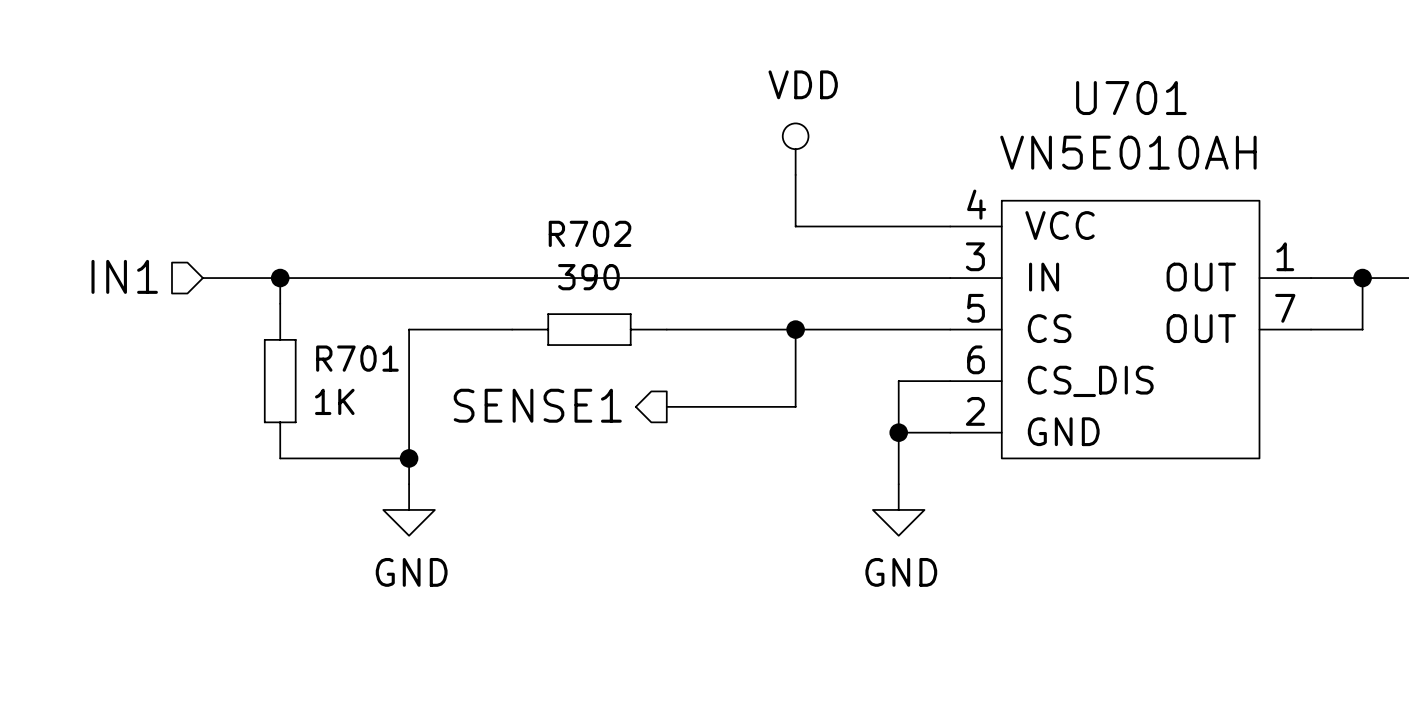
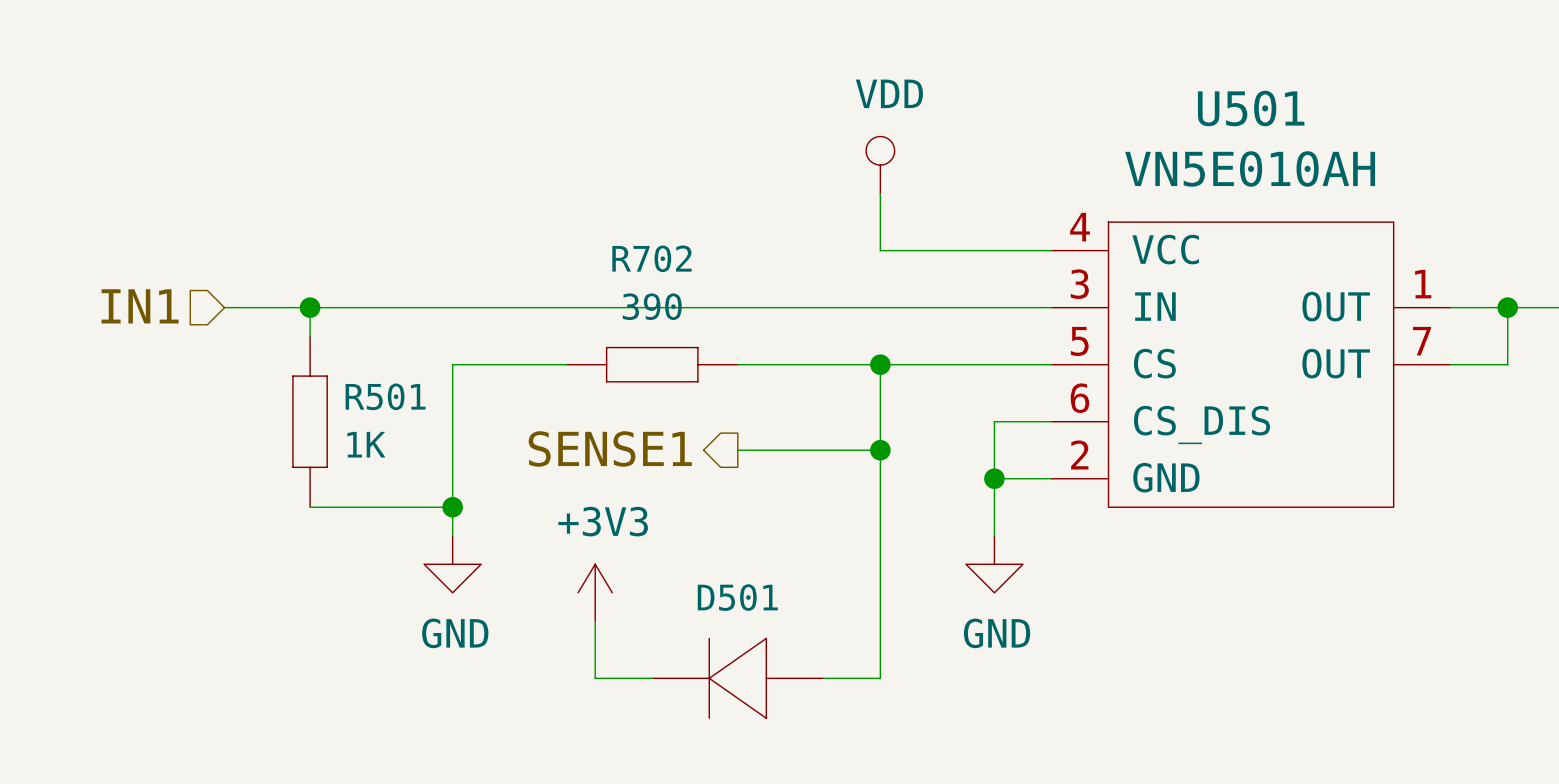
U701 name: U701 (1131, 98) -> U501 (1251, 108)
R701 name: R701 (357, 358) -> R501 (385, 396)
wire: none -> (880, 450) (880, 678) (823, 678)
junction: none -> (880, 450)
power symbol: none -> +3V3 (595, 592)
wire: none -> (595, 621) (595, 678) (652, 678)
D501: none -> (737, 678)

